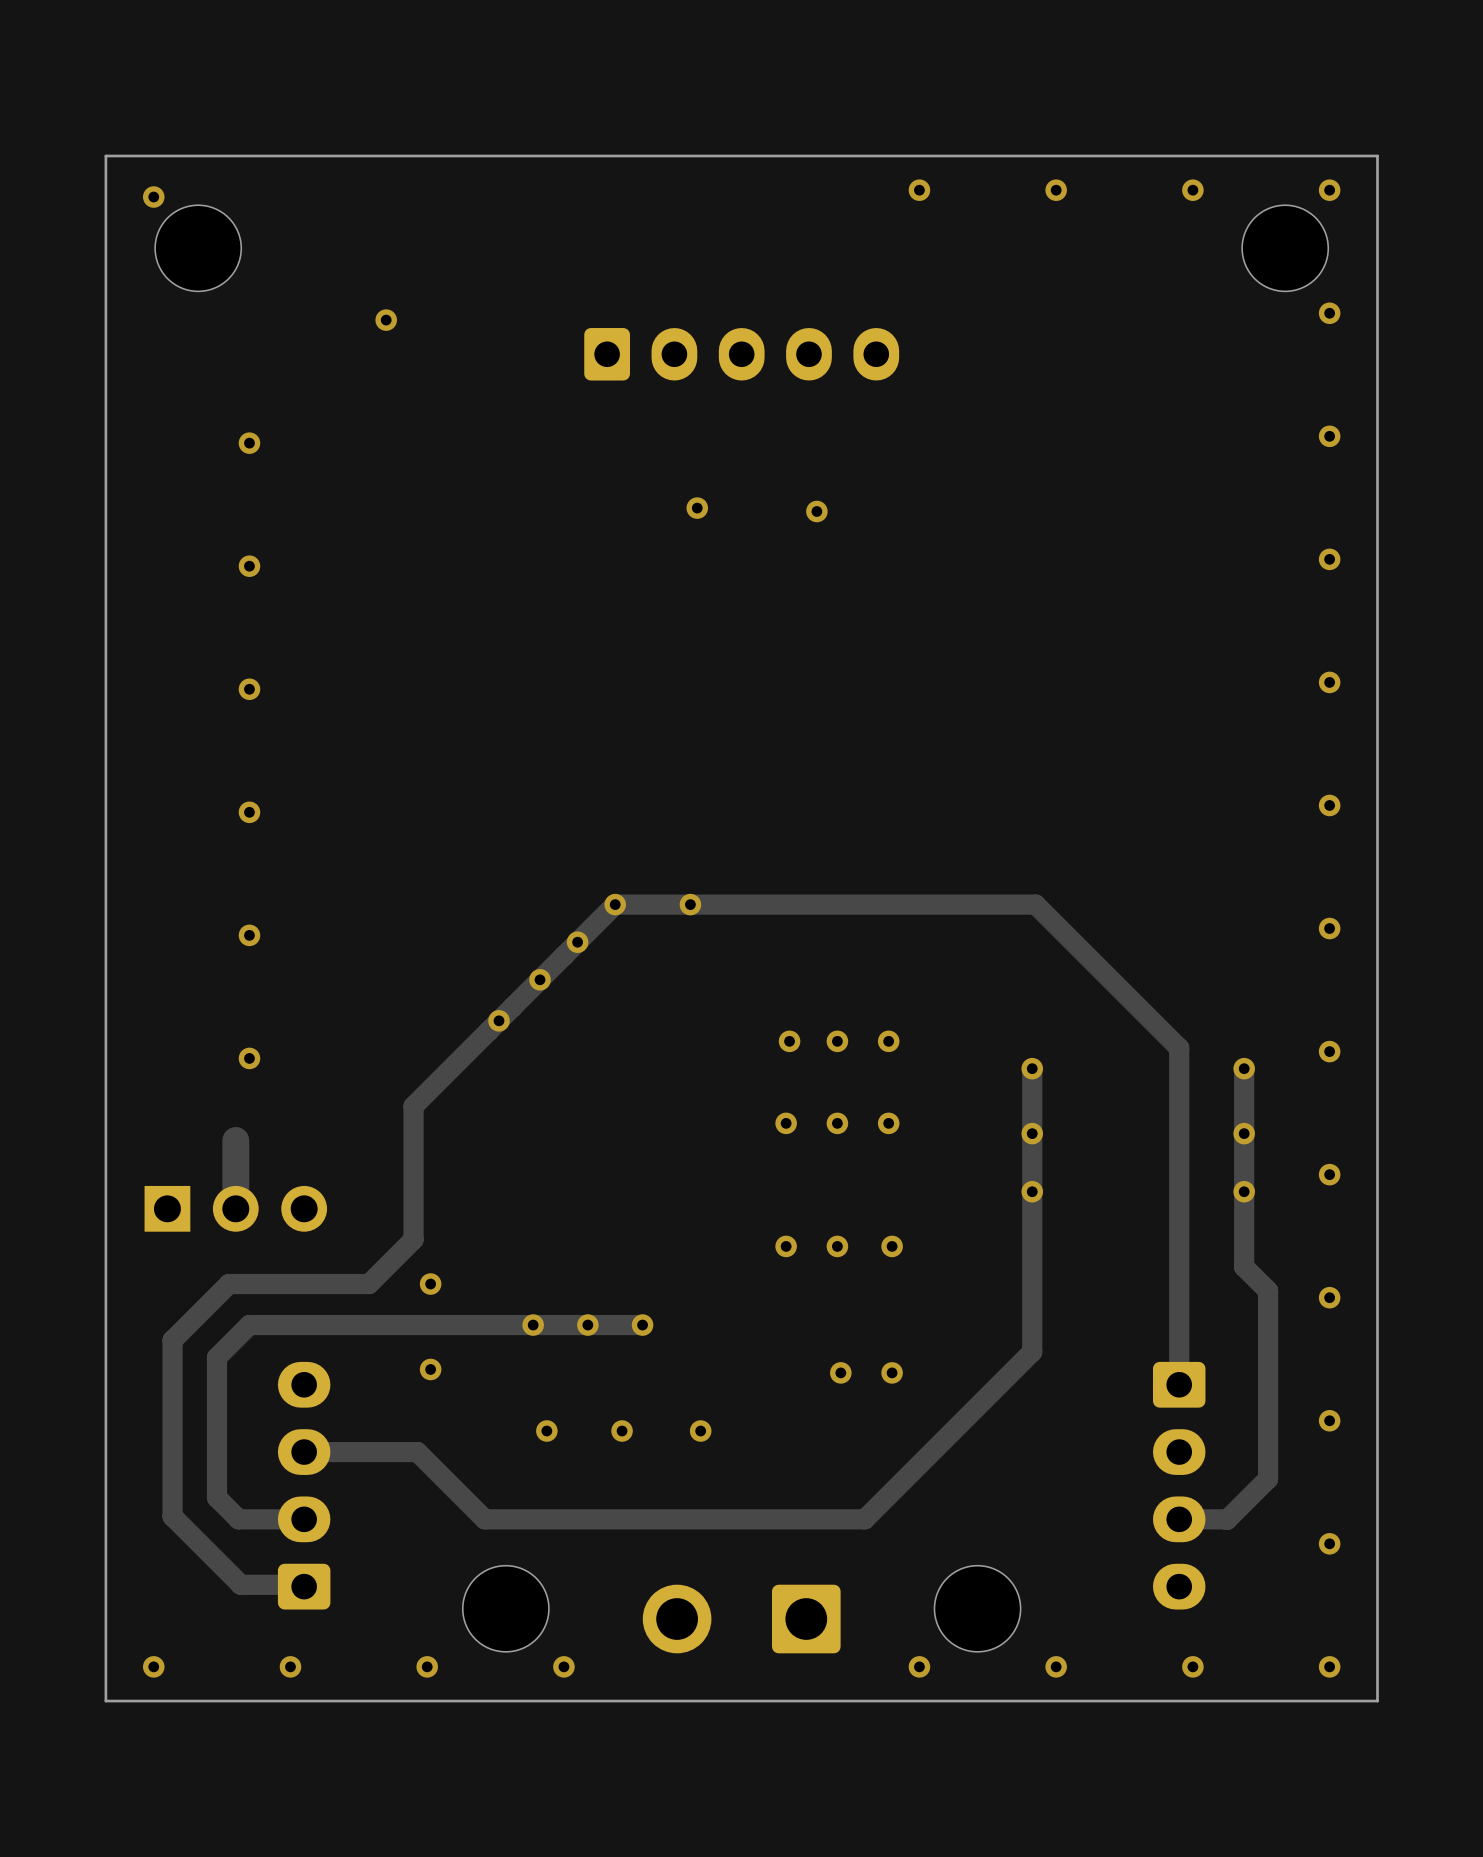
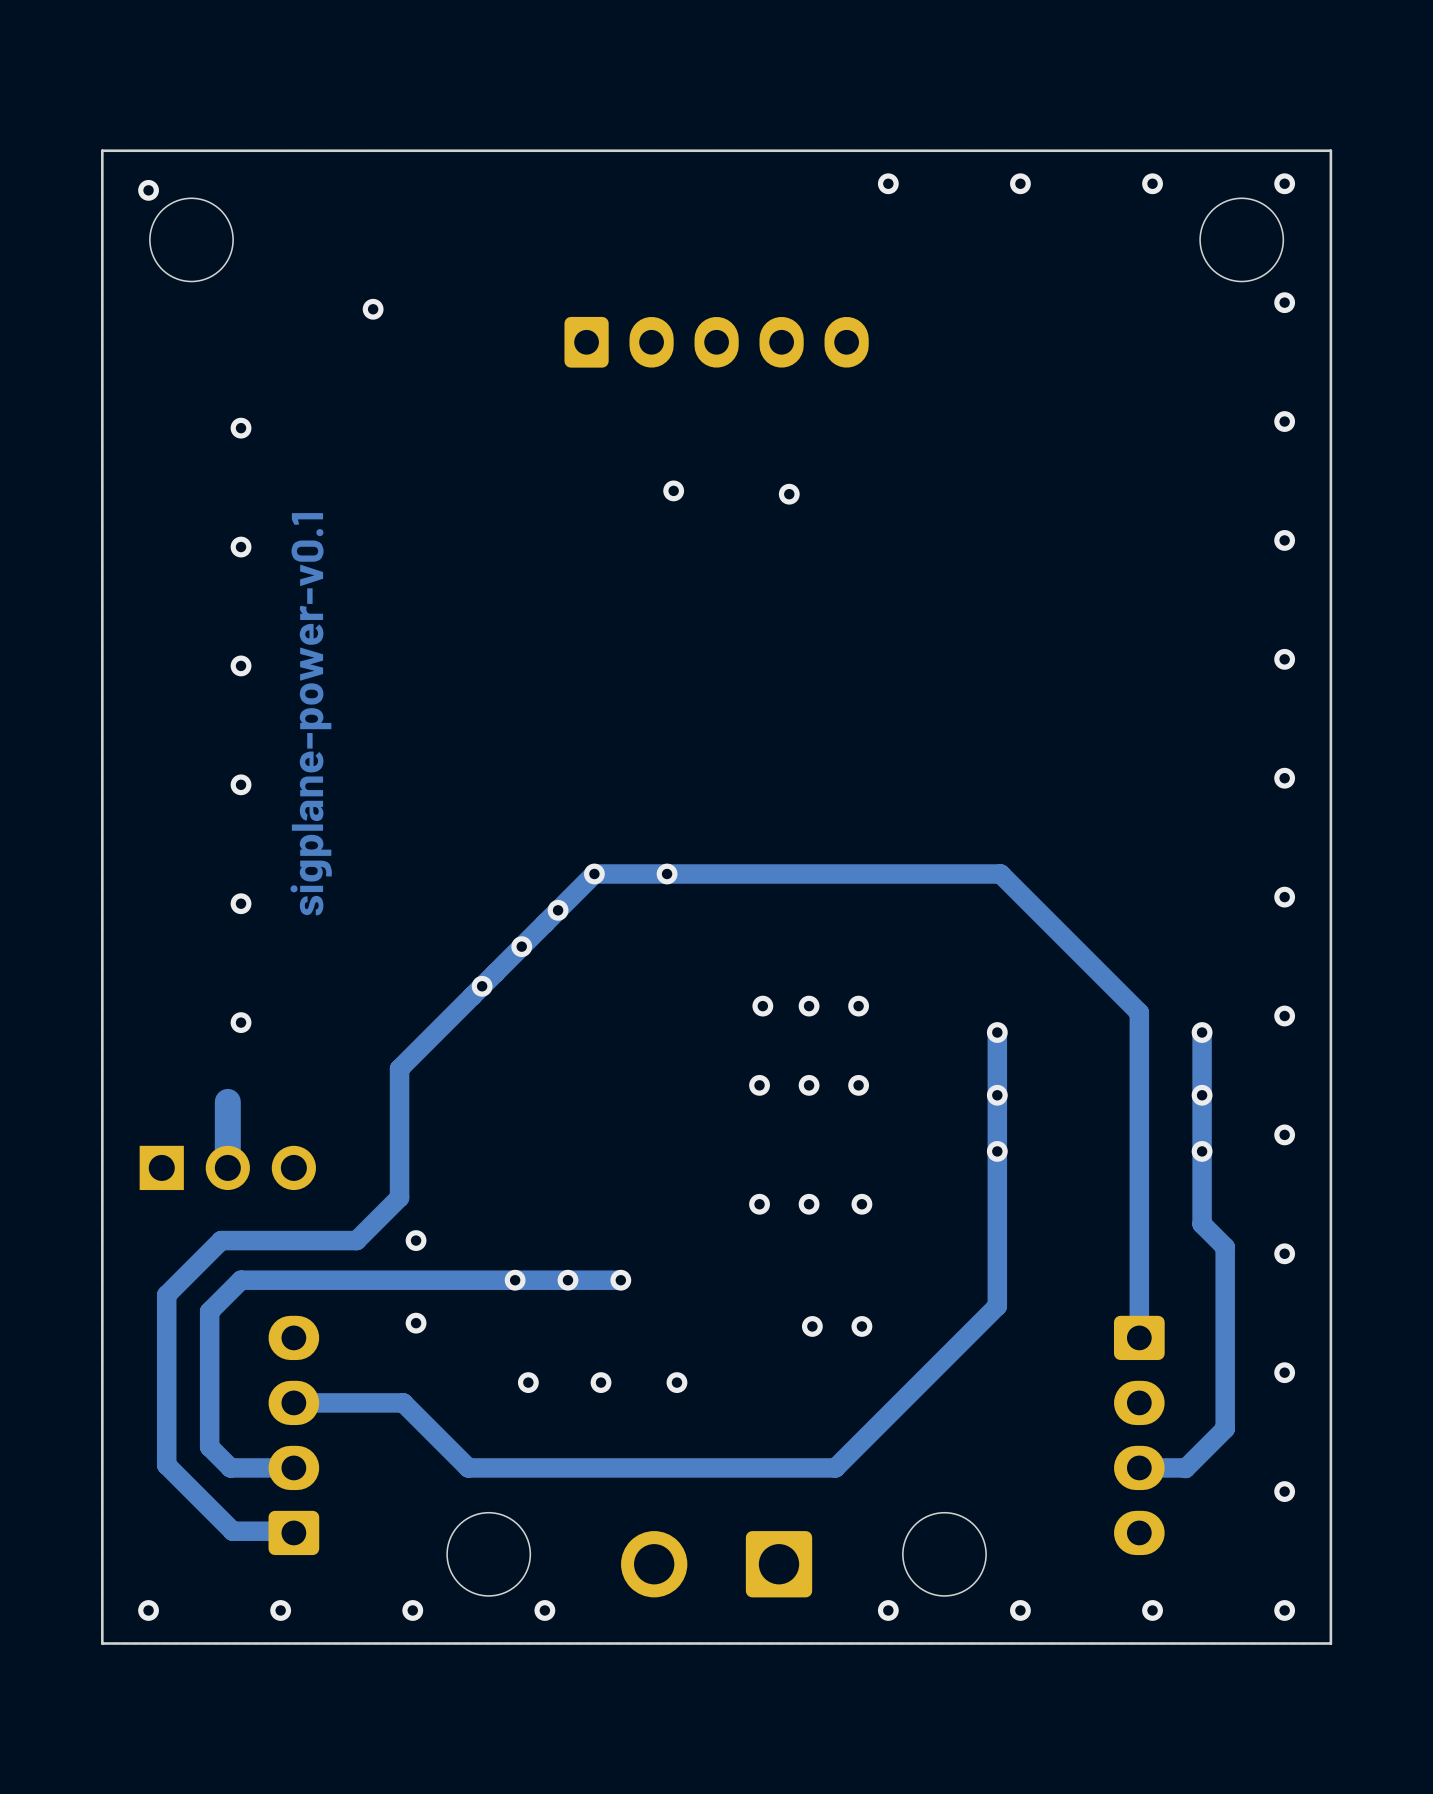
text: none -> sigplane-power-v0.1 (311, 714)

